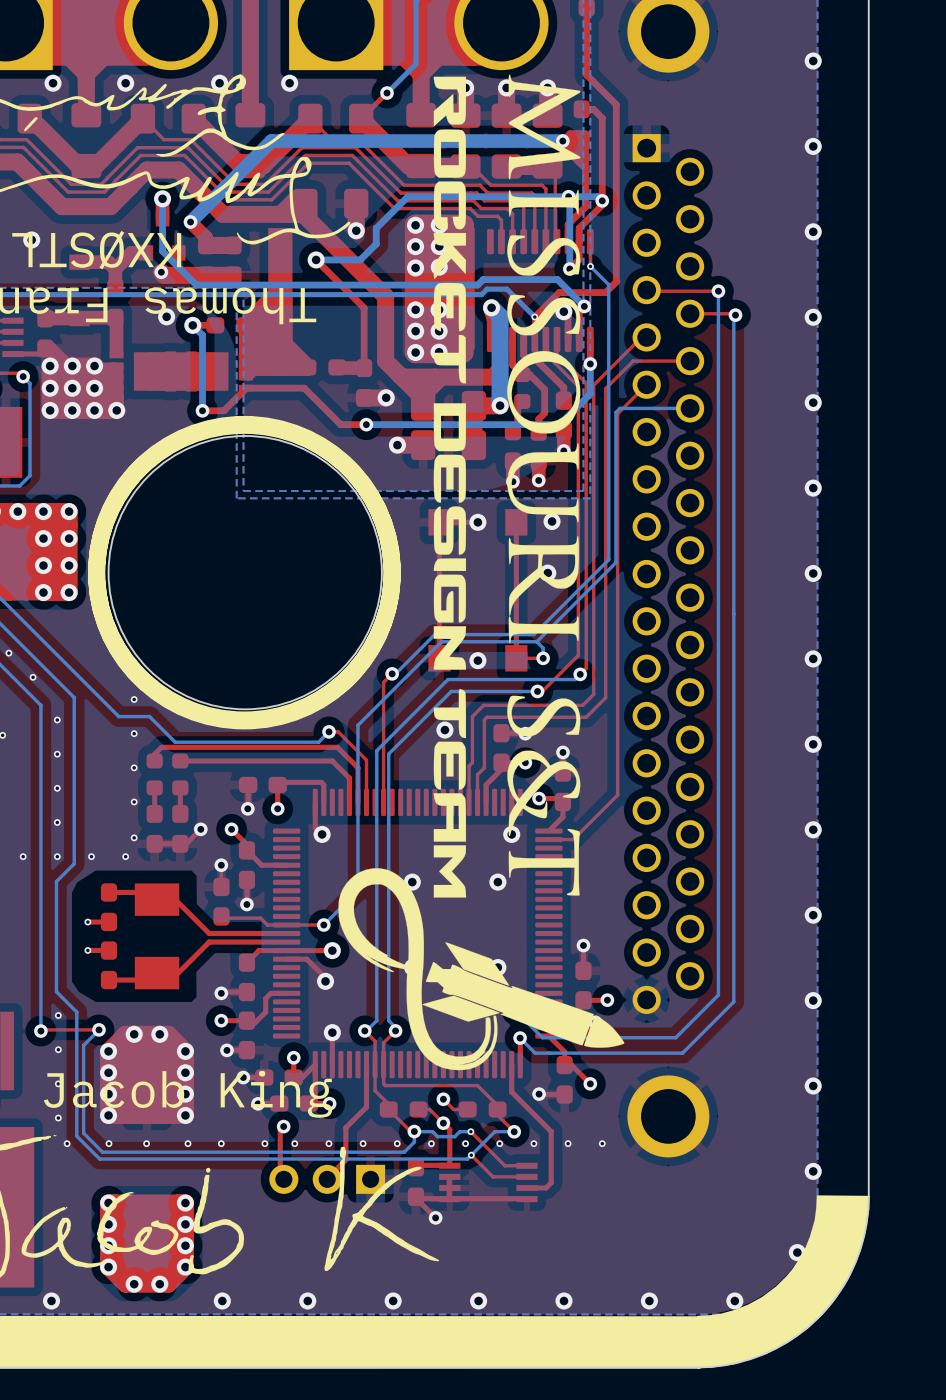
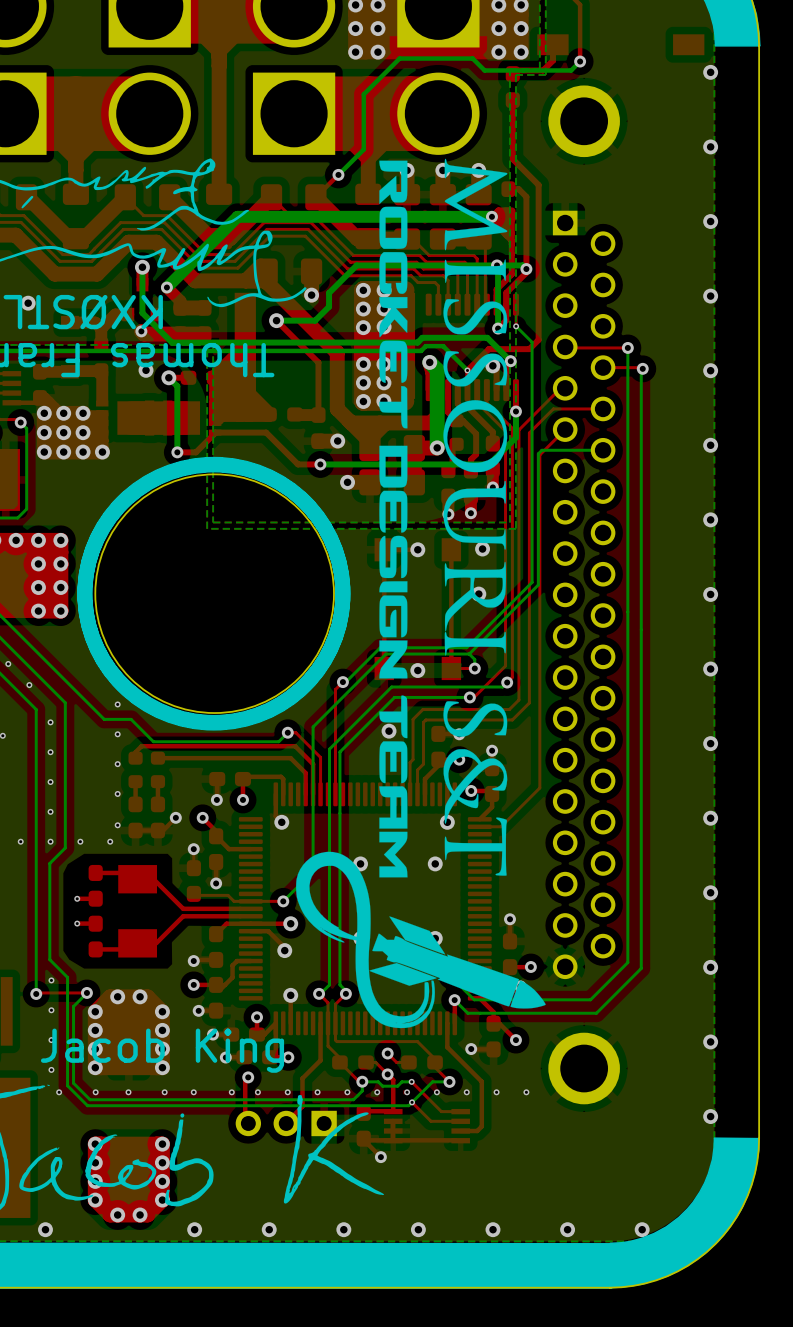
via: (53, 83) -> none
via: (125, 83) -> none
via: (219, 83) -> none
via: (289, 83) -> none
via: (797, 1252) -> none

